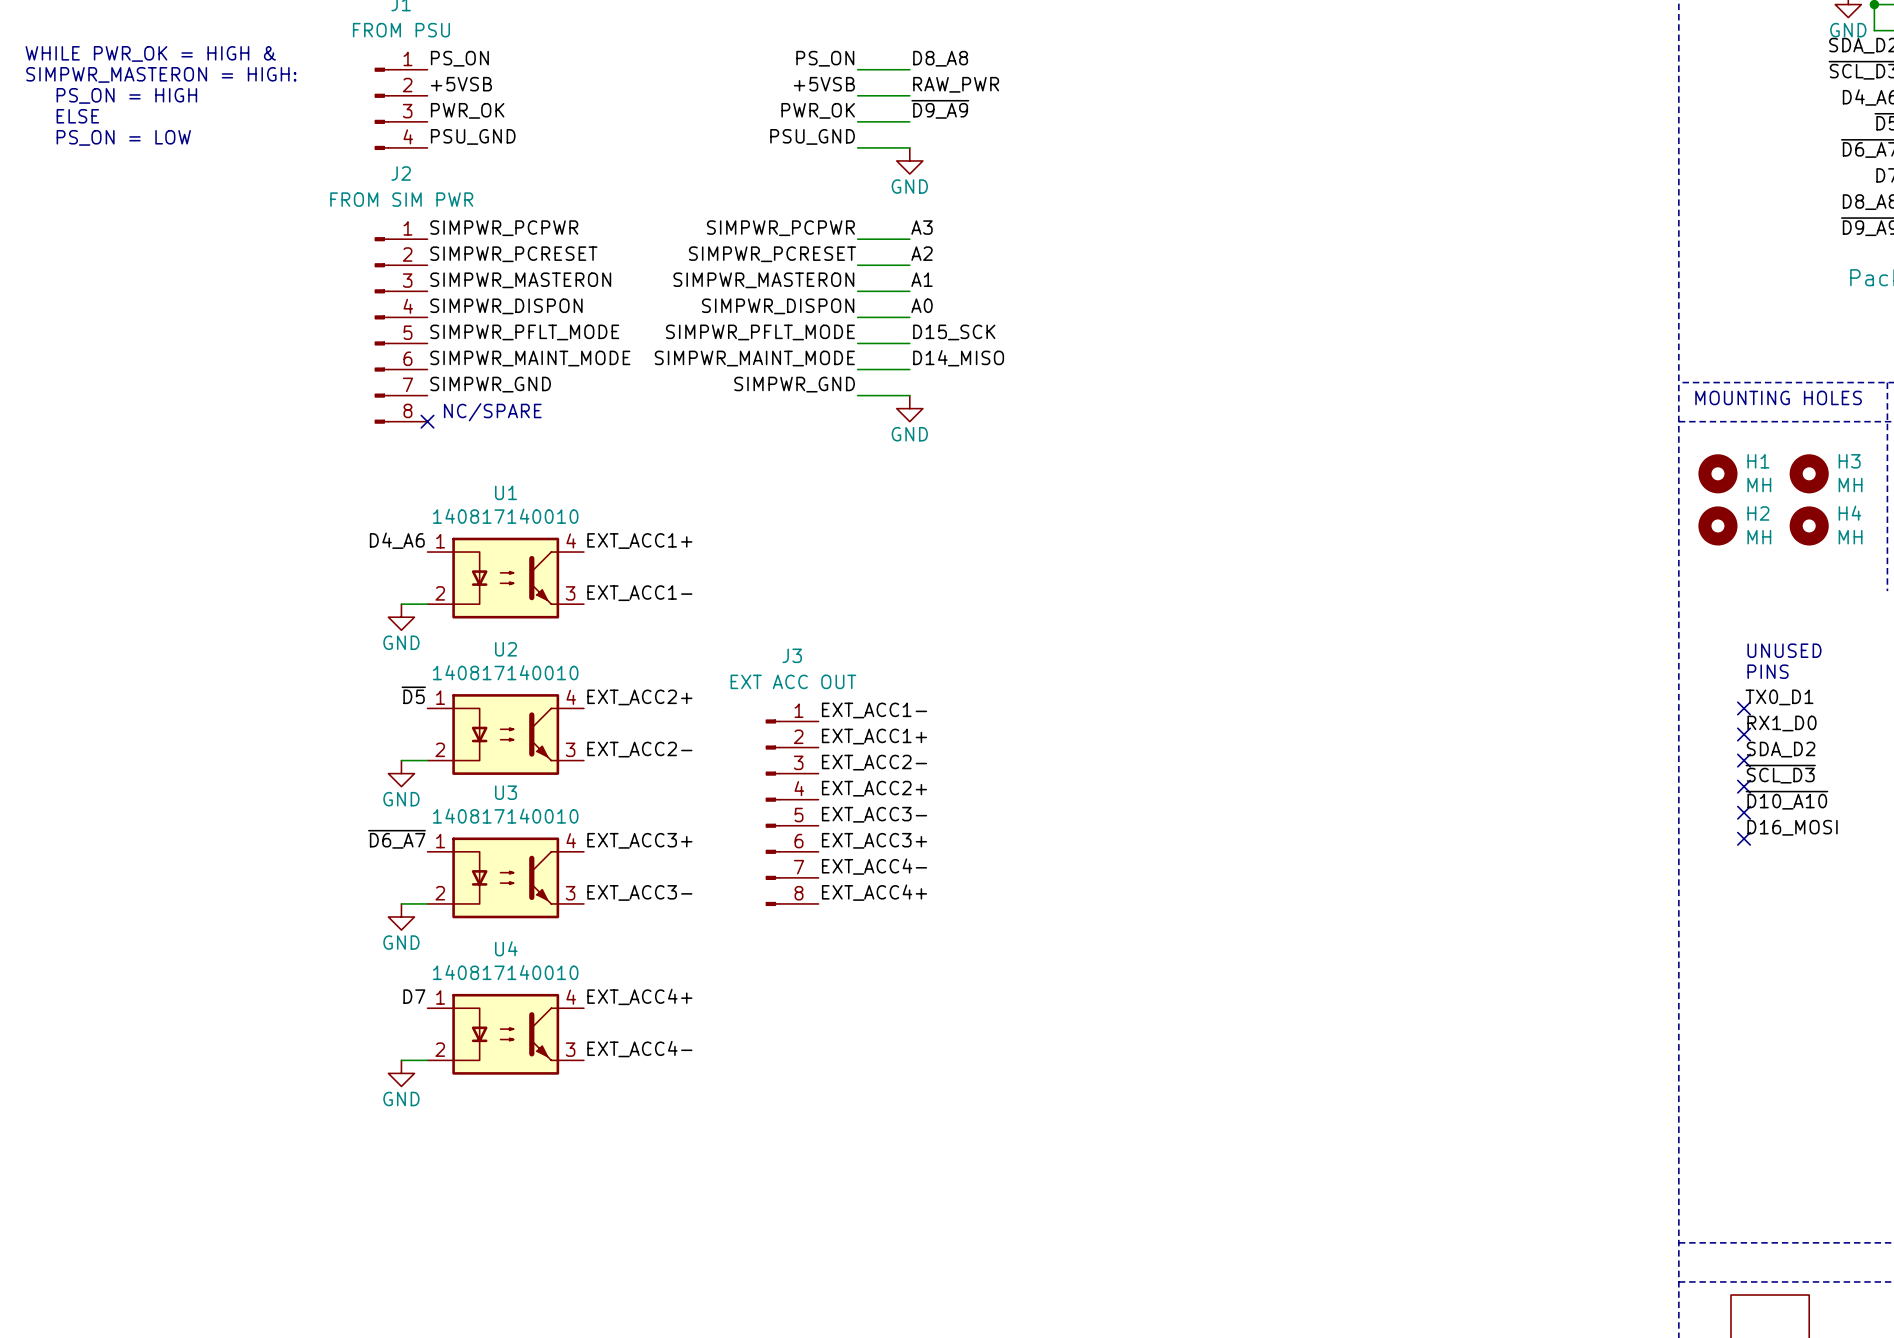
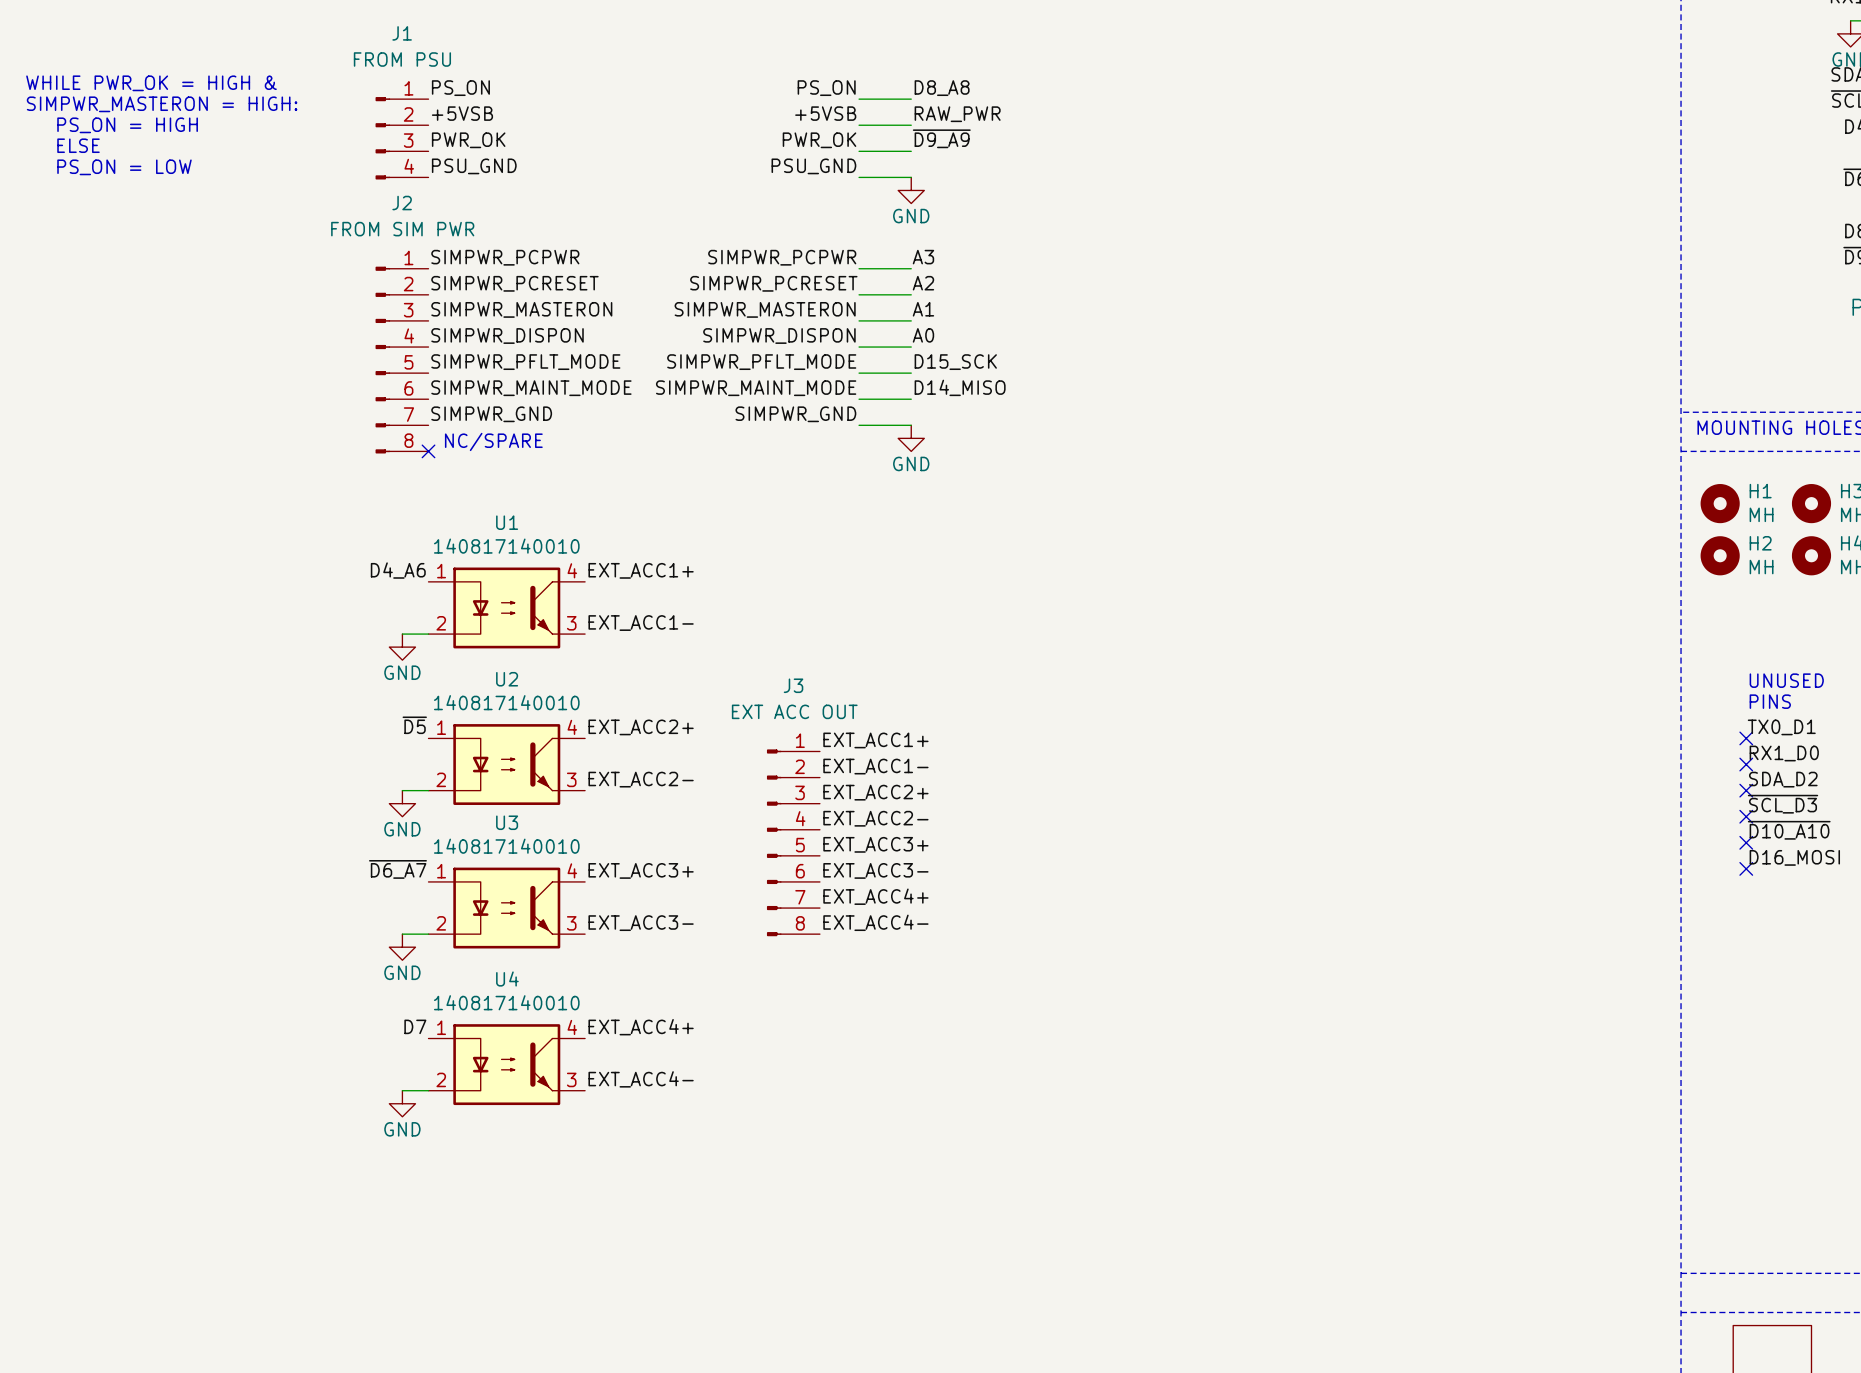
label: EXT_ACC1- (874, 710) -> EXT_ACC1+ (875, 740)
label: EXT_ACC1+ (874, 736) -> EXT_ACC1- (875, 766)
label: EXT_ACC2- (874, 762) -> EXT_ACC2+ (875, 792)
label: EXT_ACC2+ (874, 788) -> EXT_ACC2- (875, 818)
label: EXT_ACC3- (874, 814) -> EXT_ACC3+ (875, 844)
label: EXT_ACC3+ (874, 840) -> EXT_ACC3- (875, 870)
label: EXT_ACC4- (874, 866) -> EXT_ACC4+ (875, 896)
label: EXT_ACC4+ (874, 892) -> EXT_ACC4- (875, 922)

